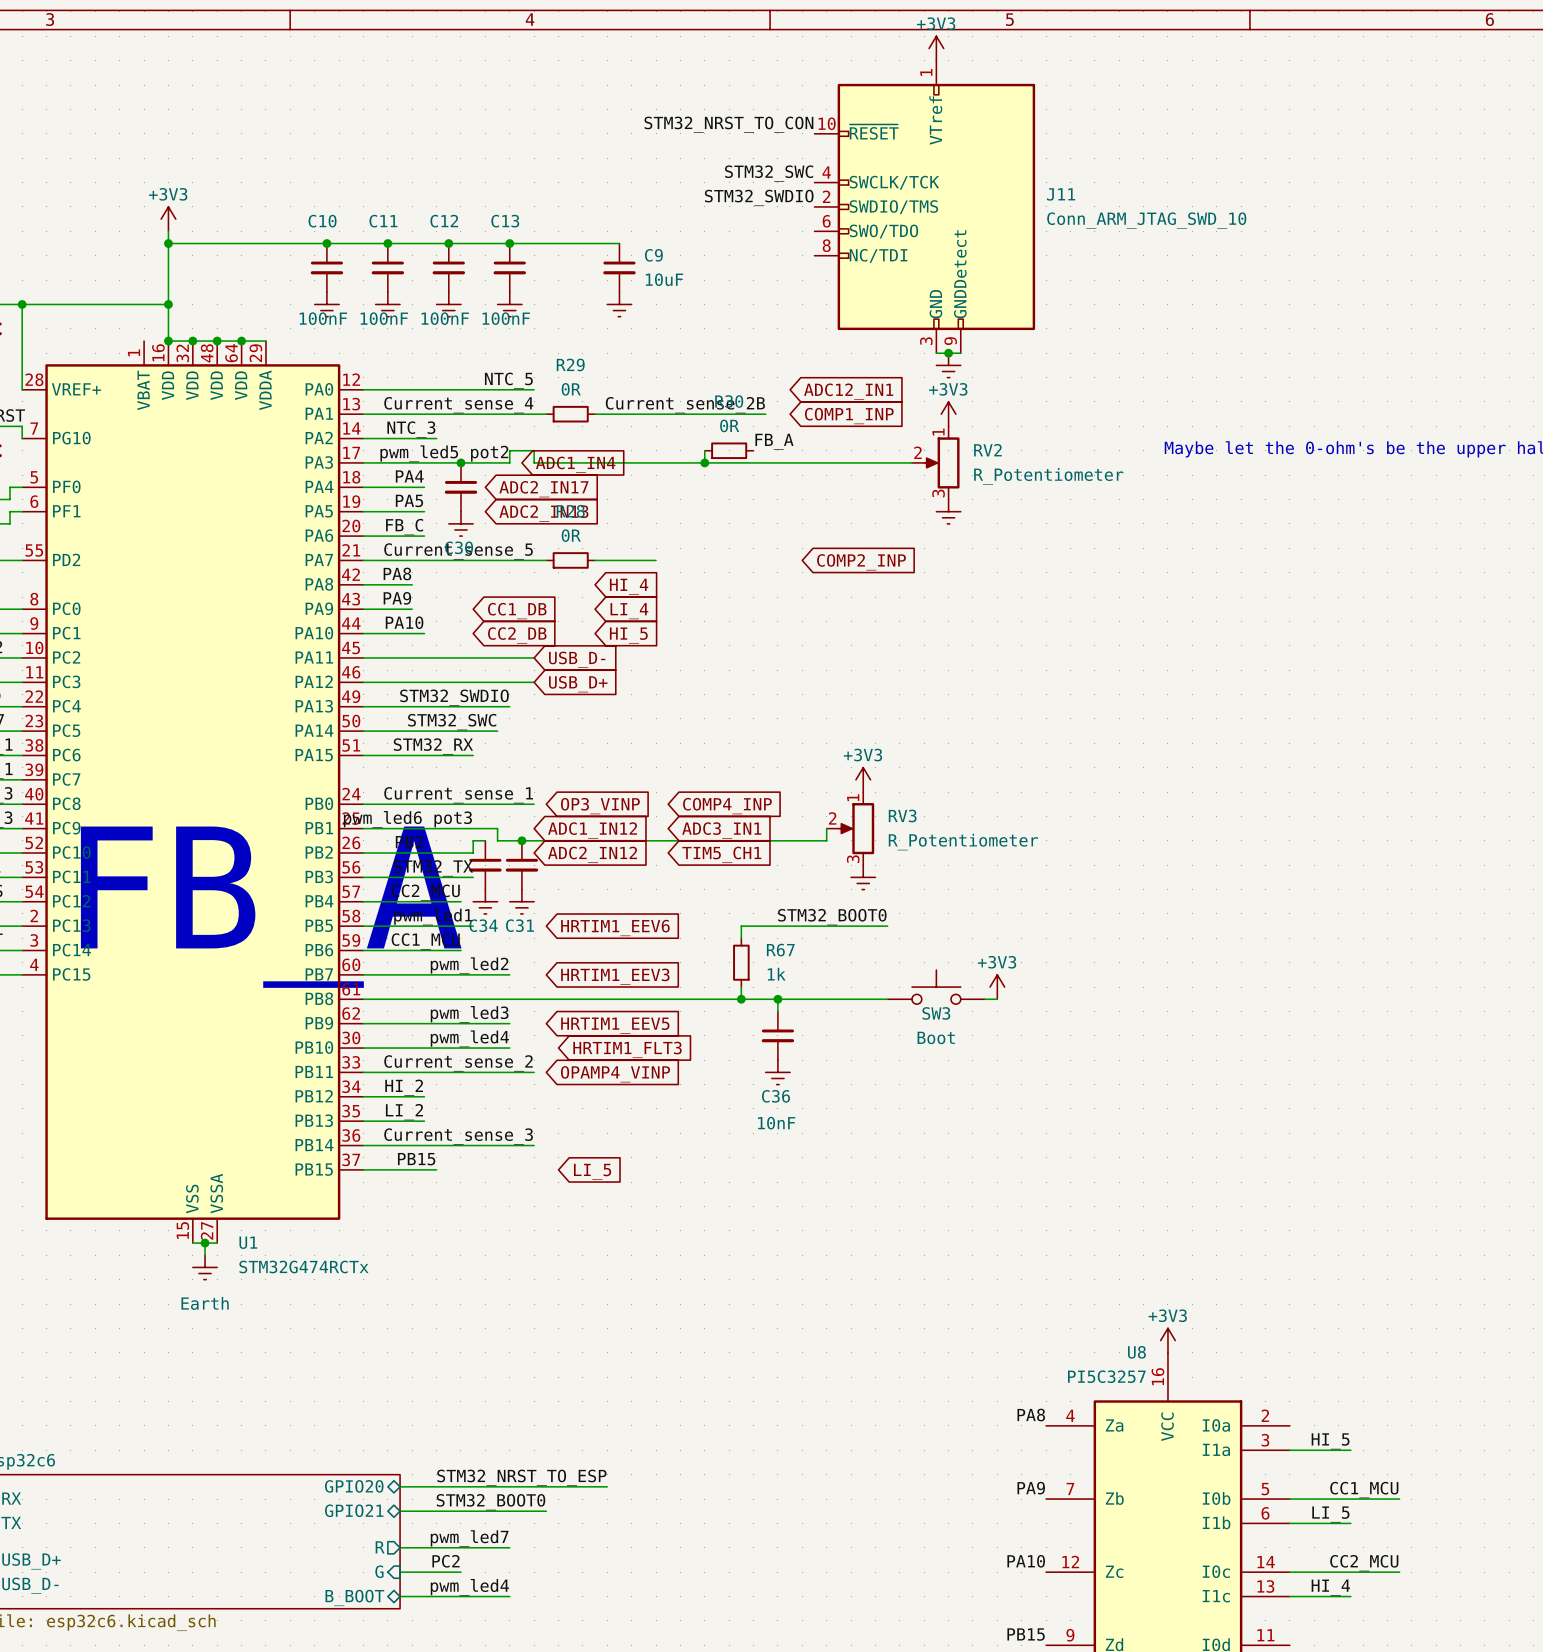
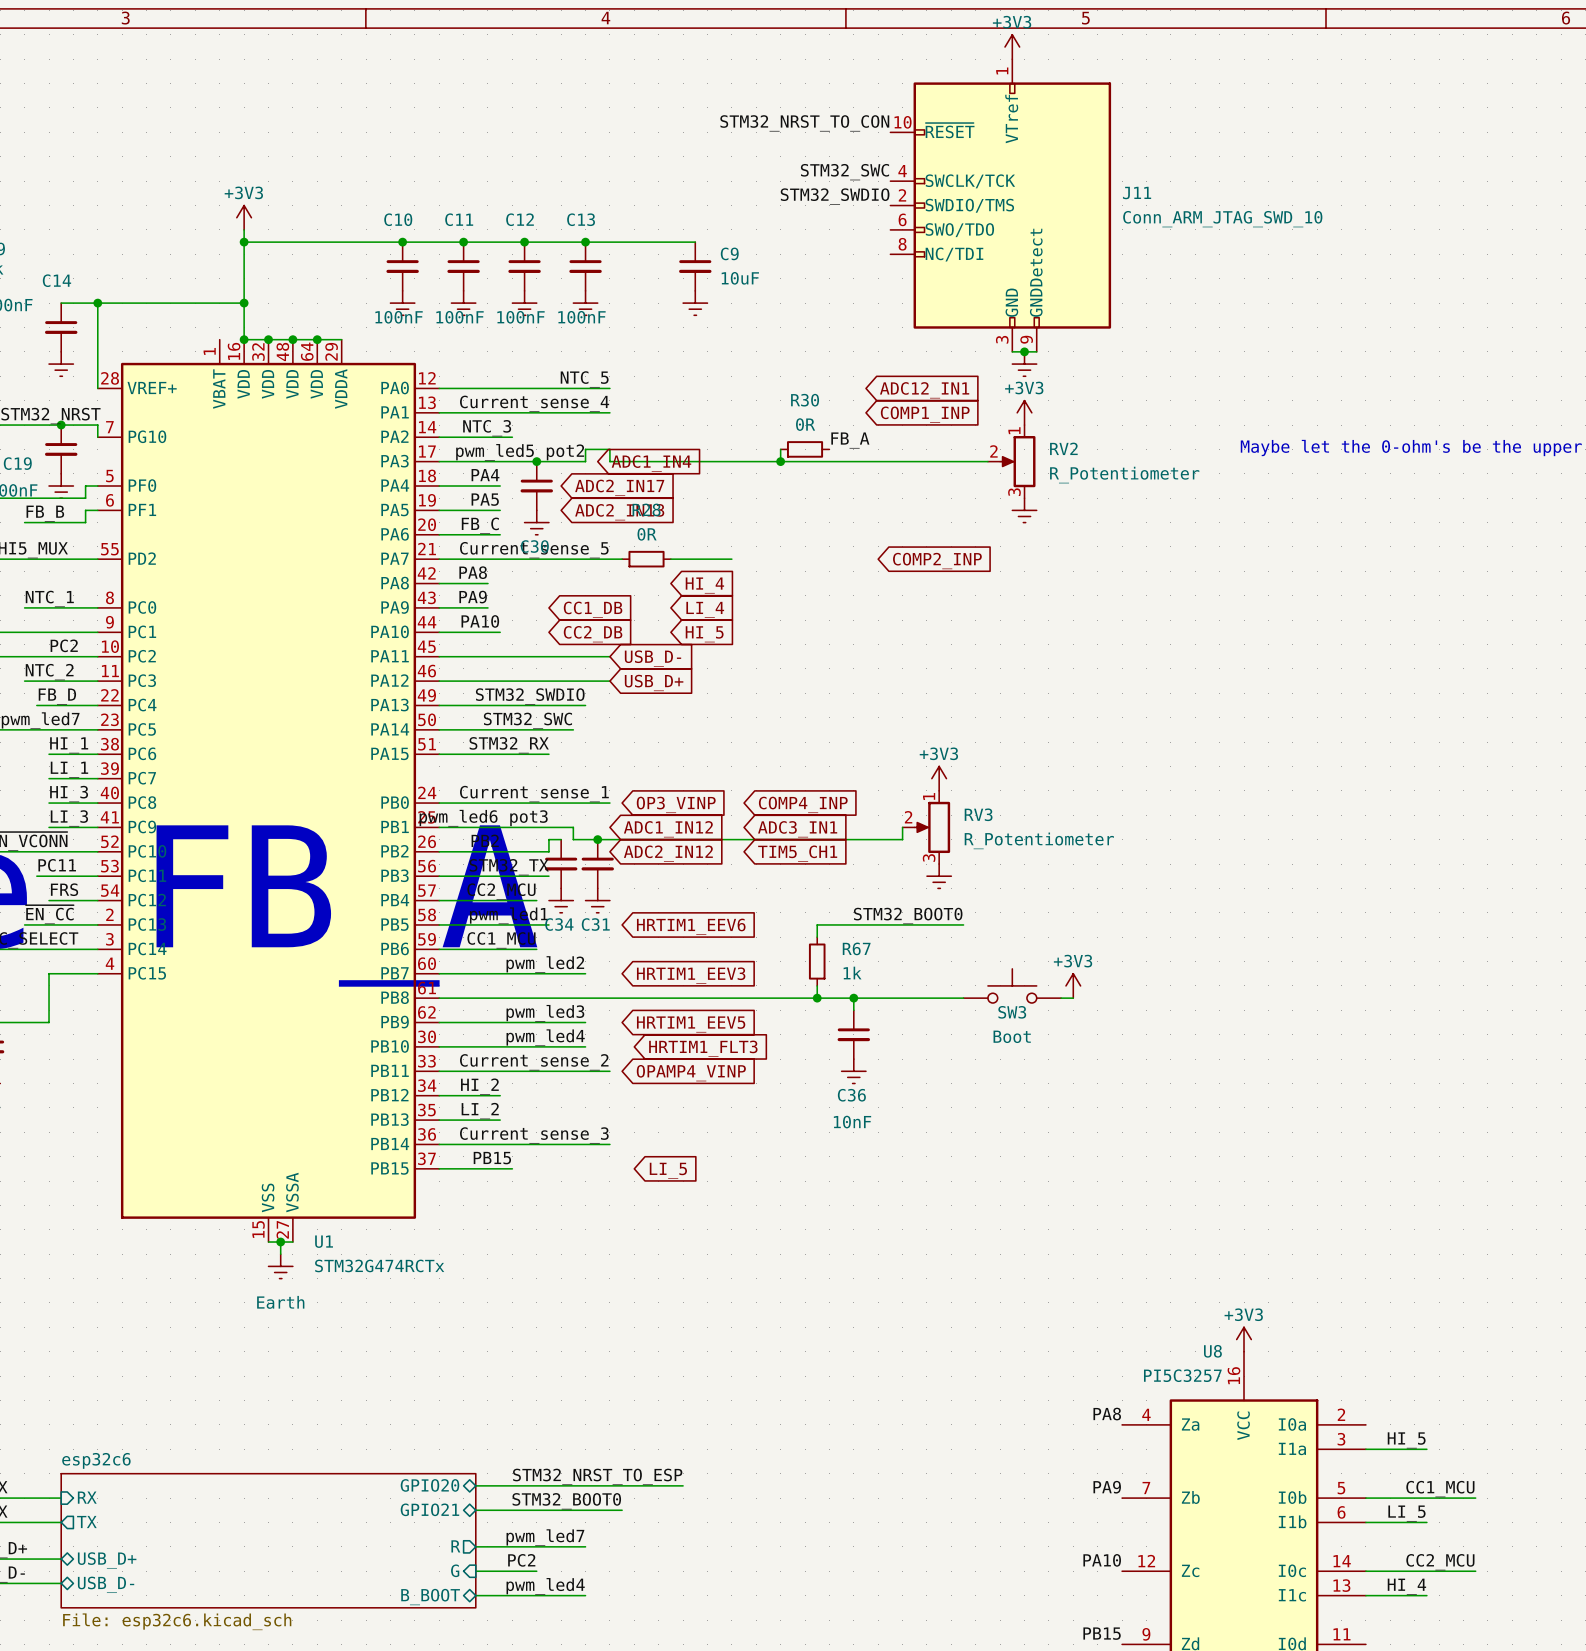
label: Current_sense_2B (685, 405) -> none
wire: (534, 414) (546, 414) -> none
R29: 0R (570, 414) -> none
wire: (595, 414) (765, 414) -> none

